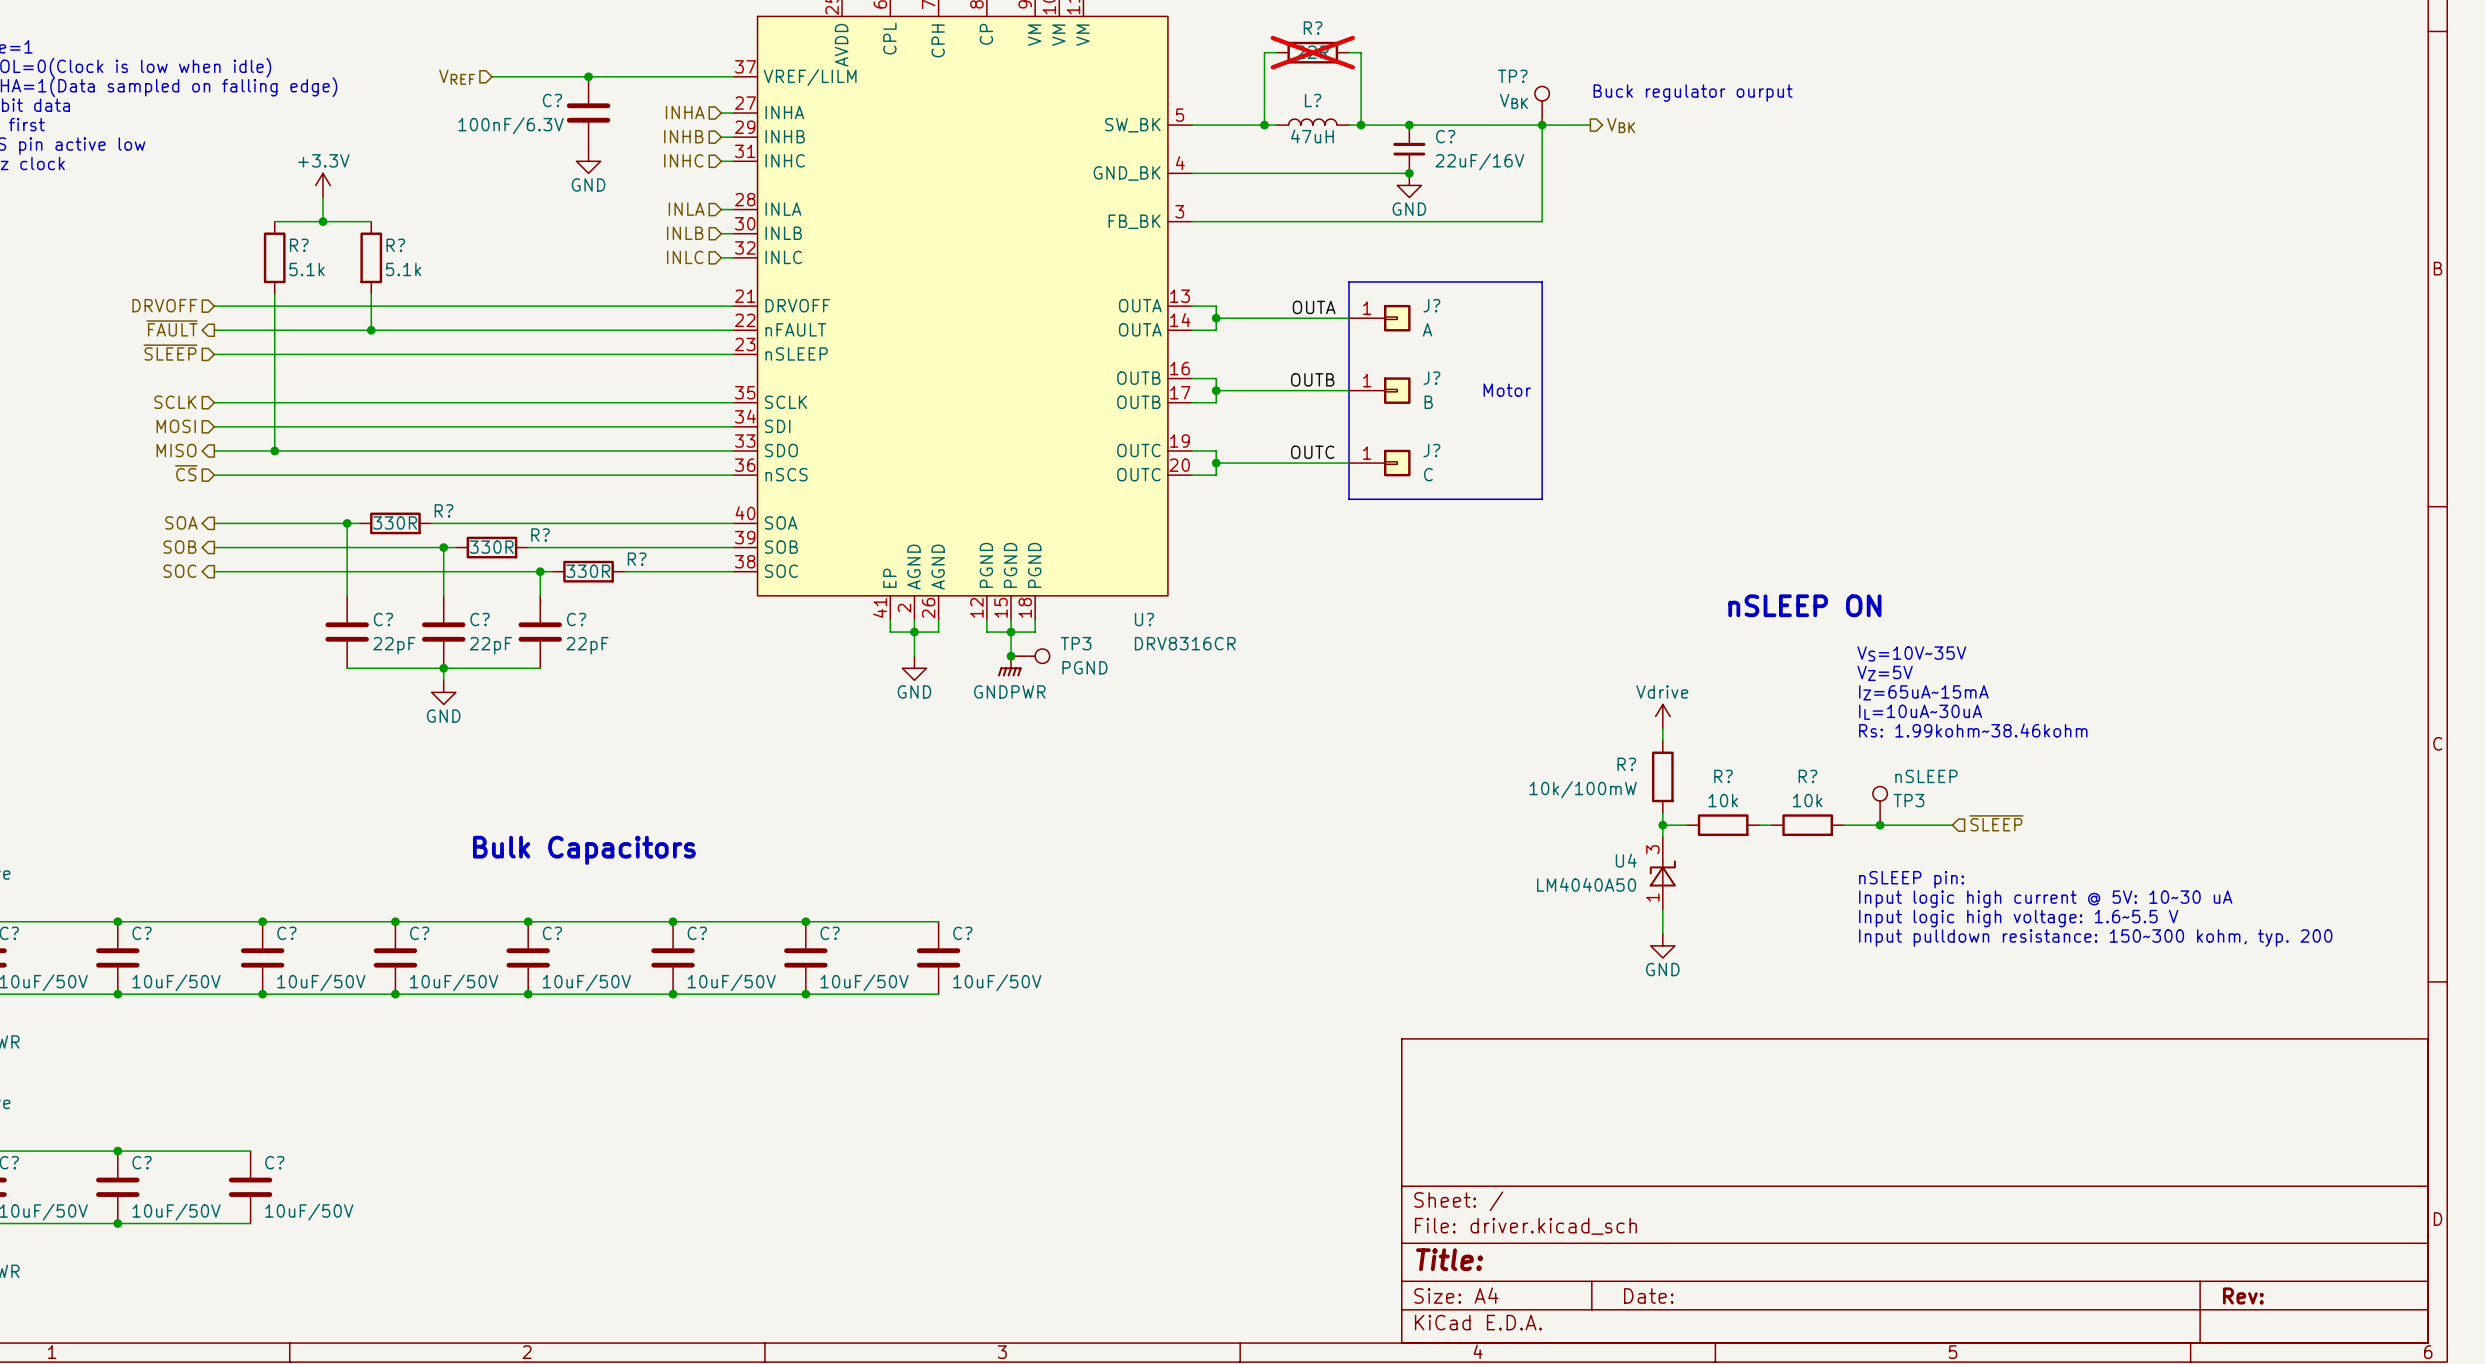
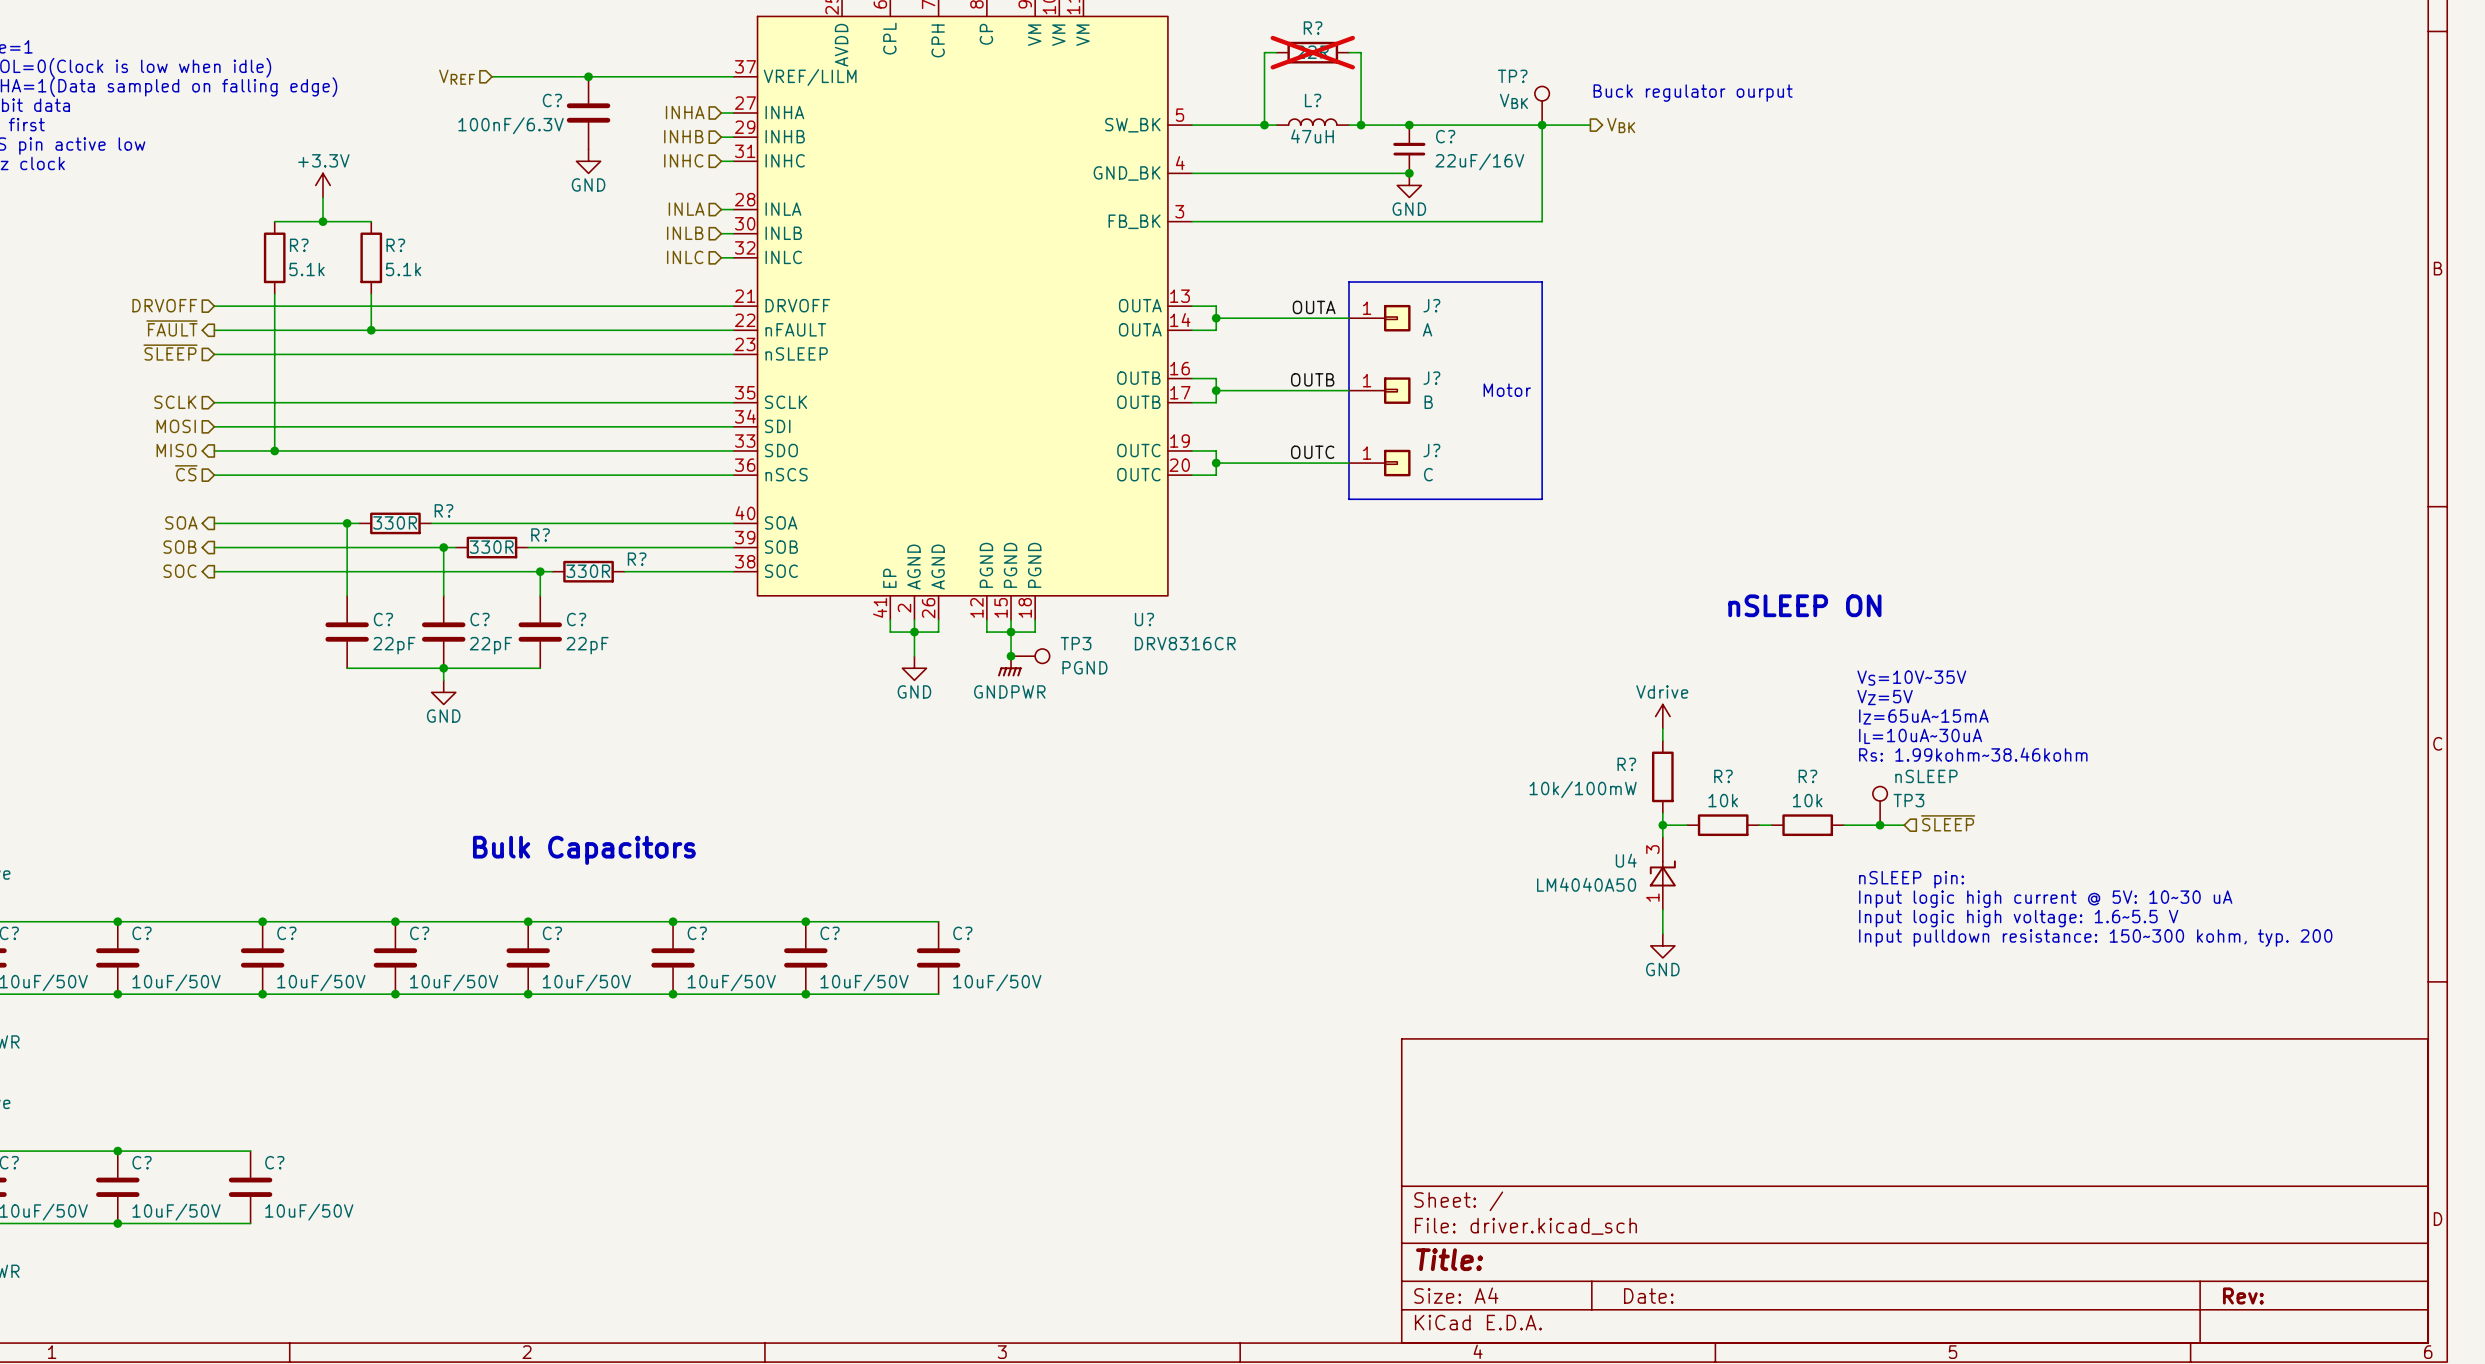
text: VS=10V~35V (1911, 653) -> none
text: VZ=5V (1885, 673) -> VS=10V~35V (1911, 678)
text: IZ=65uA~15mA (1923, 692) -> VZ=5V (1885, 697)
text: IL=10uA~30uA (1920, 712) -> IZ=65uA~15mA (1923, 716)
text: Rs: 1.99kohm~38.46kohm (1973, 730) -> IL=10uA~30uA (1920, 736)
text: none -> Rs: 1.99kohm~38.46kohm (1973, 754)
hierarchical label position: ~{SLEEP} (1996, 823) -> ~{SLEEP} (1948, 823)
wire: (1904, 825) (1952, 825) -> none

